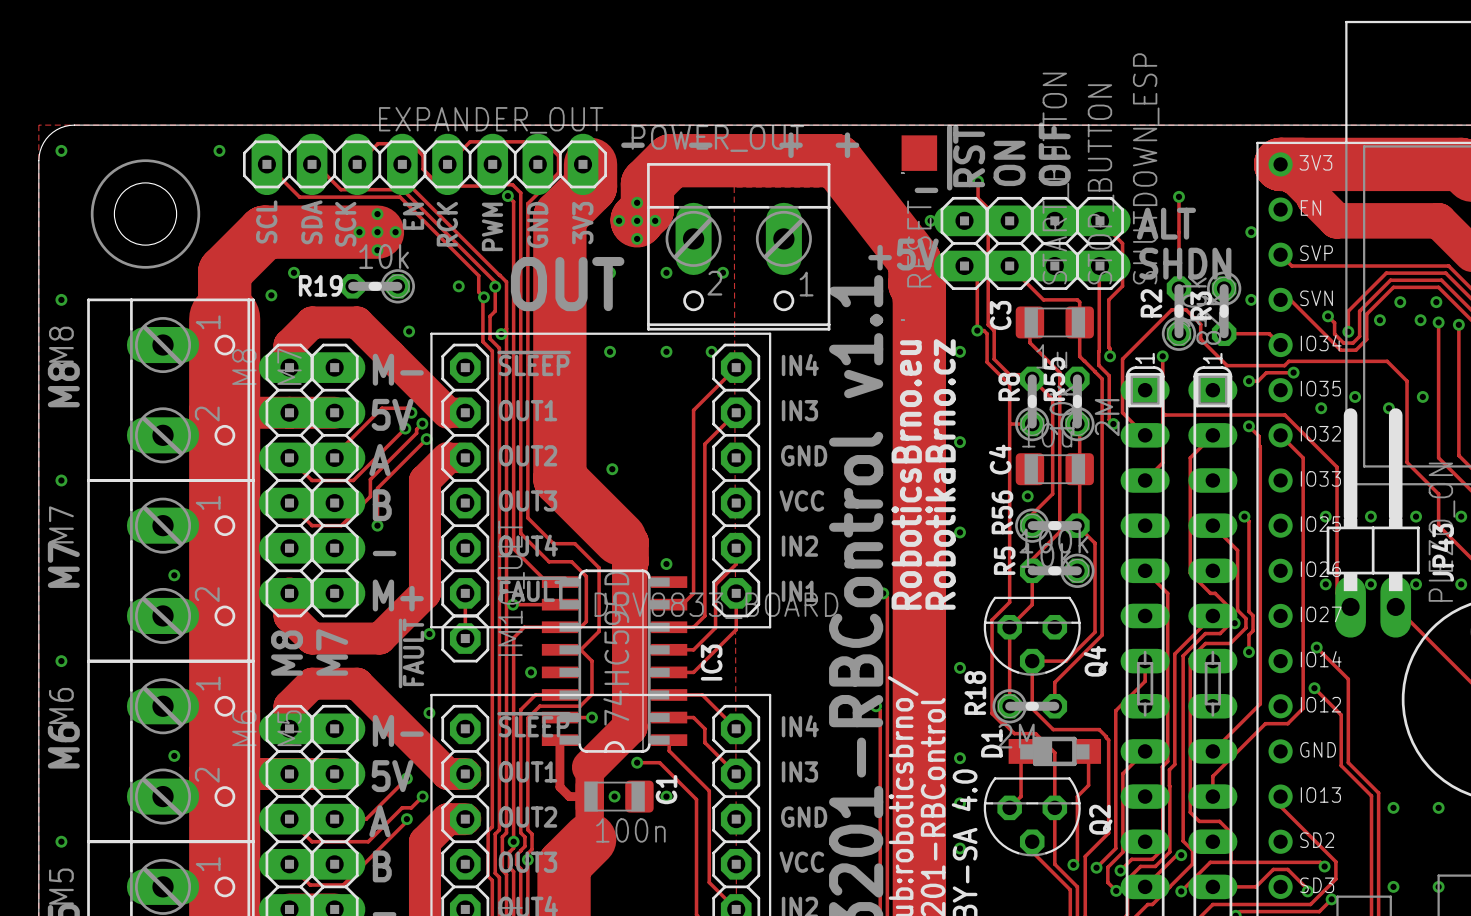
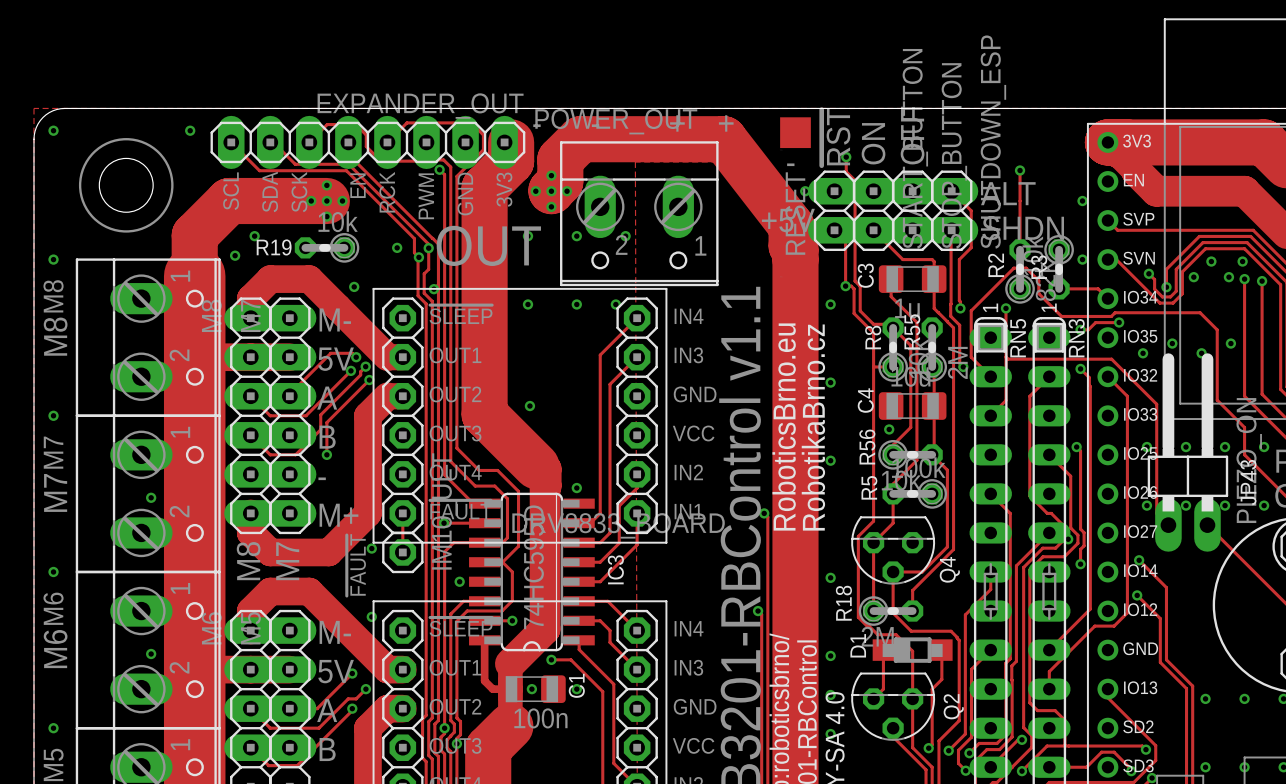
RN5 name: none -> RN5 (1018, 338)
RN3 name: none -> RN3 (1076, 338)

